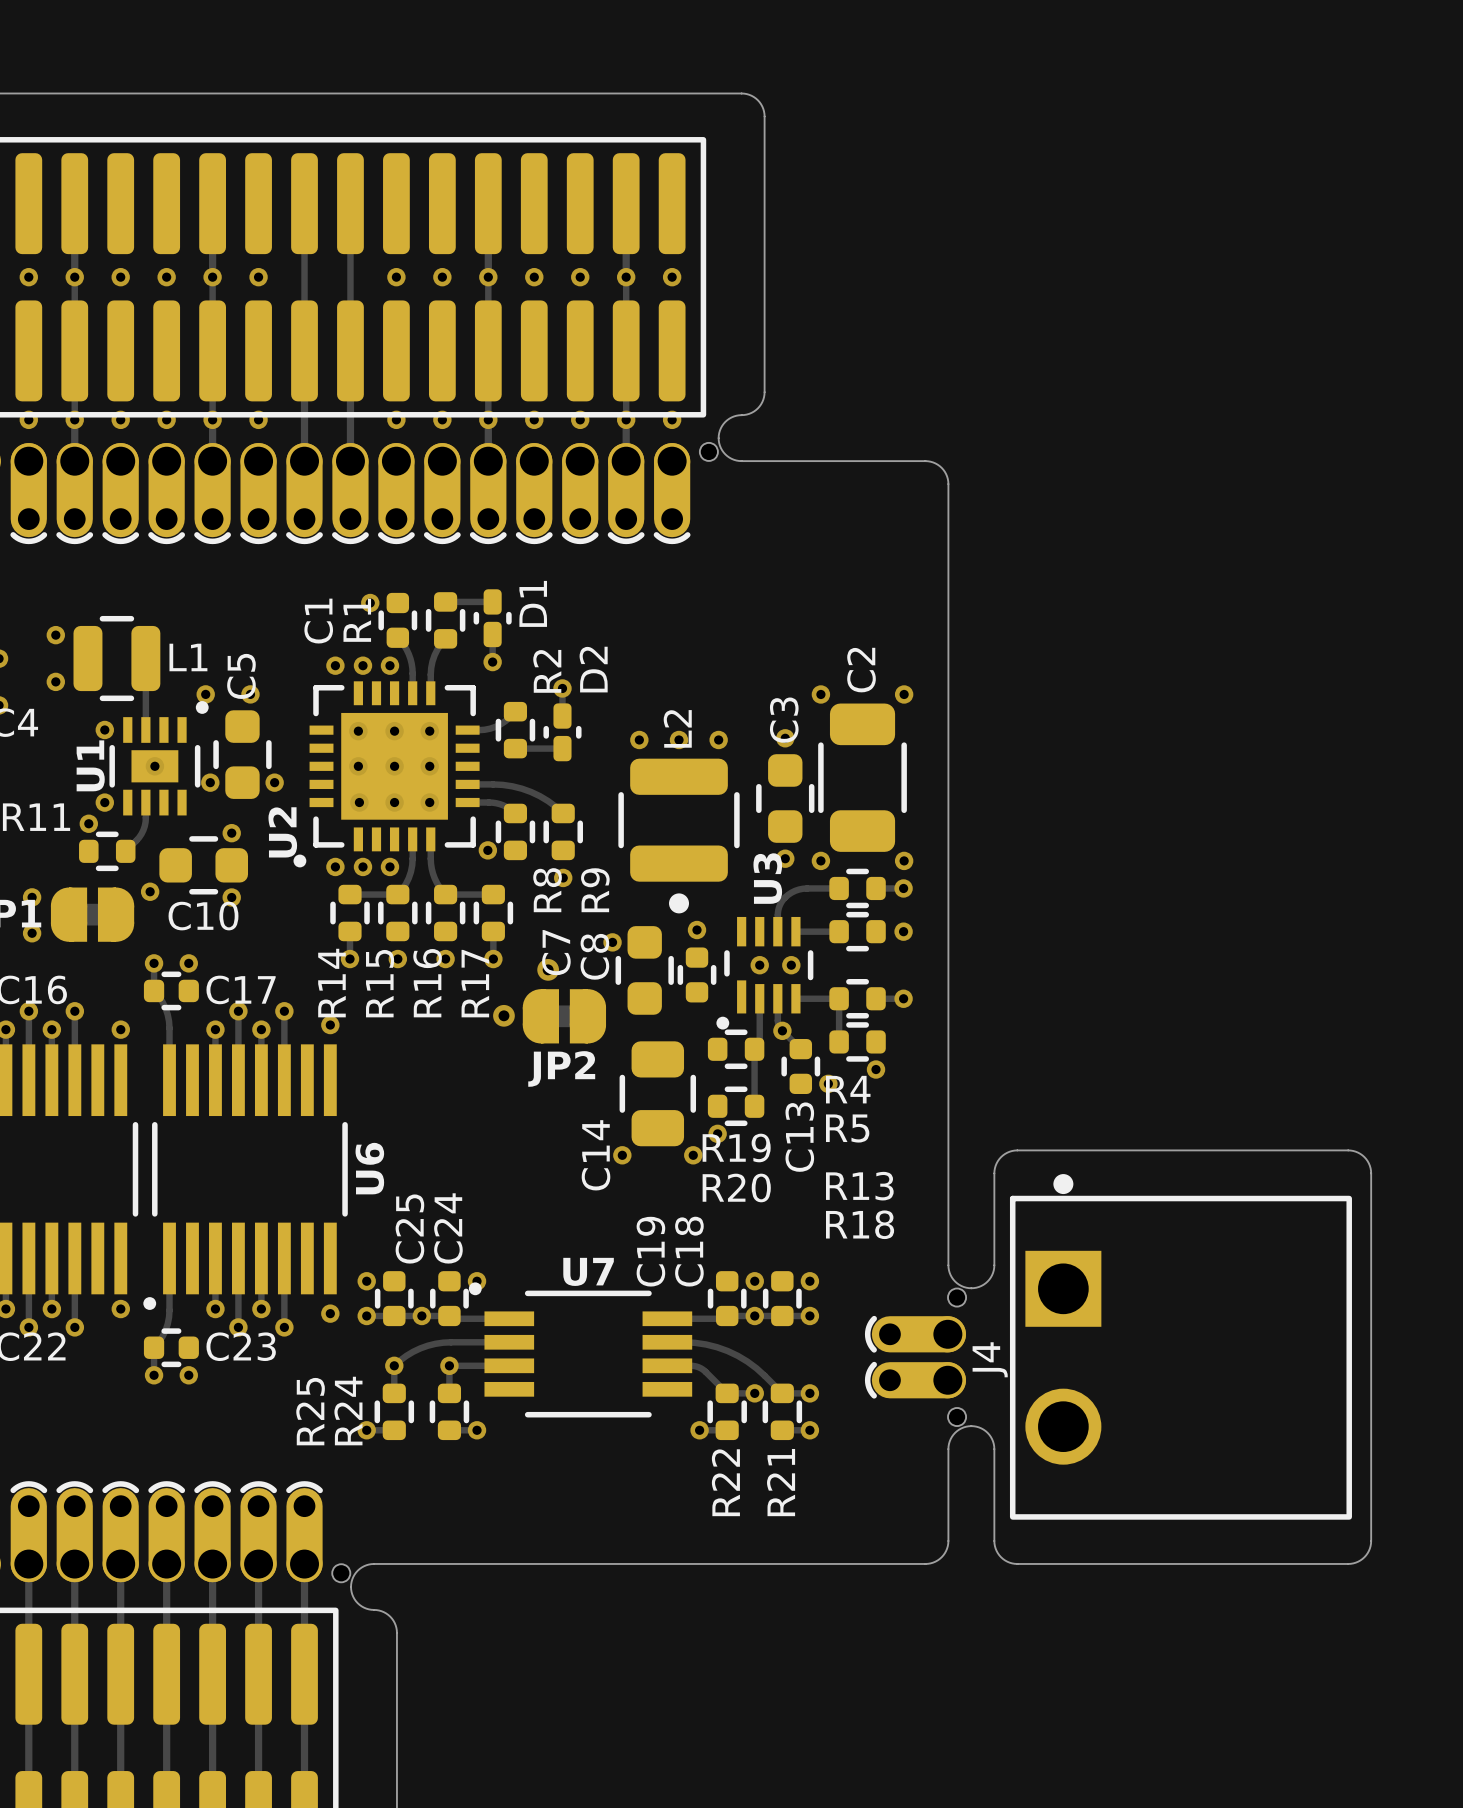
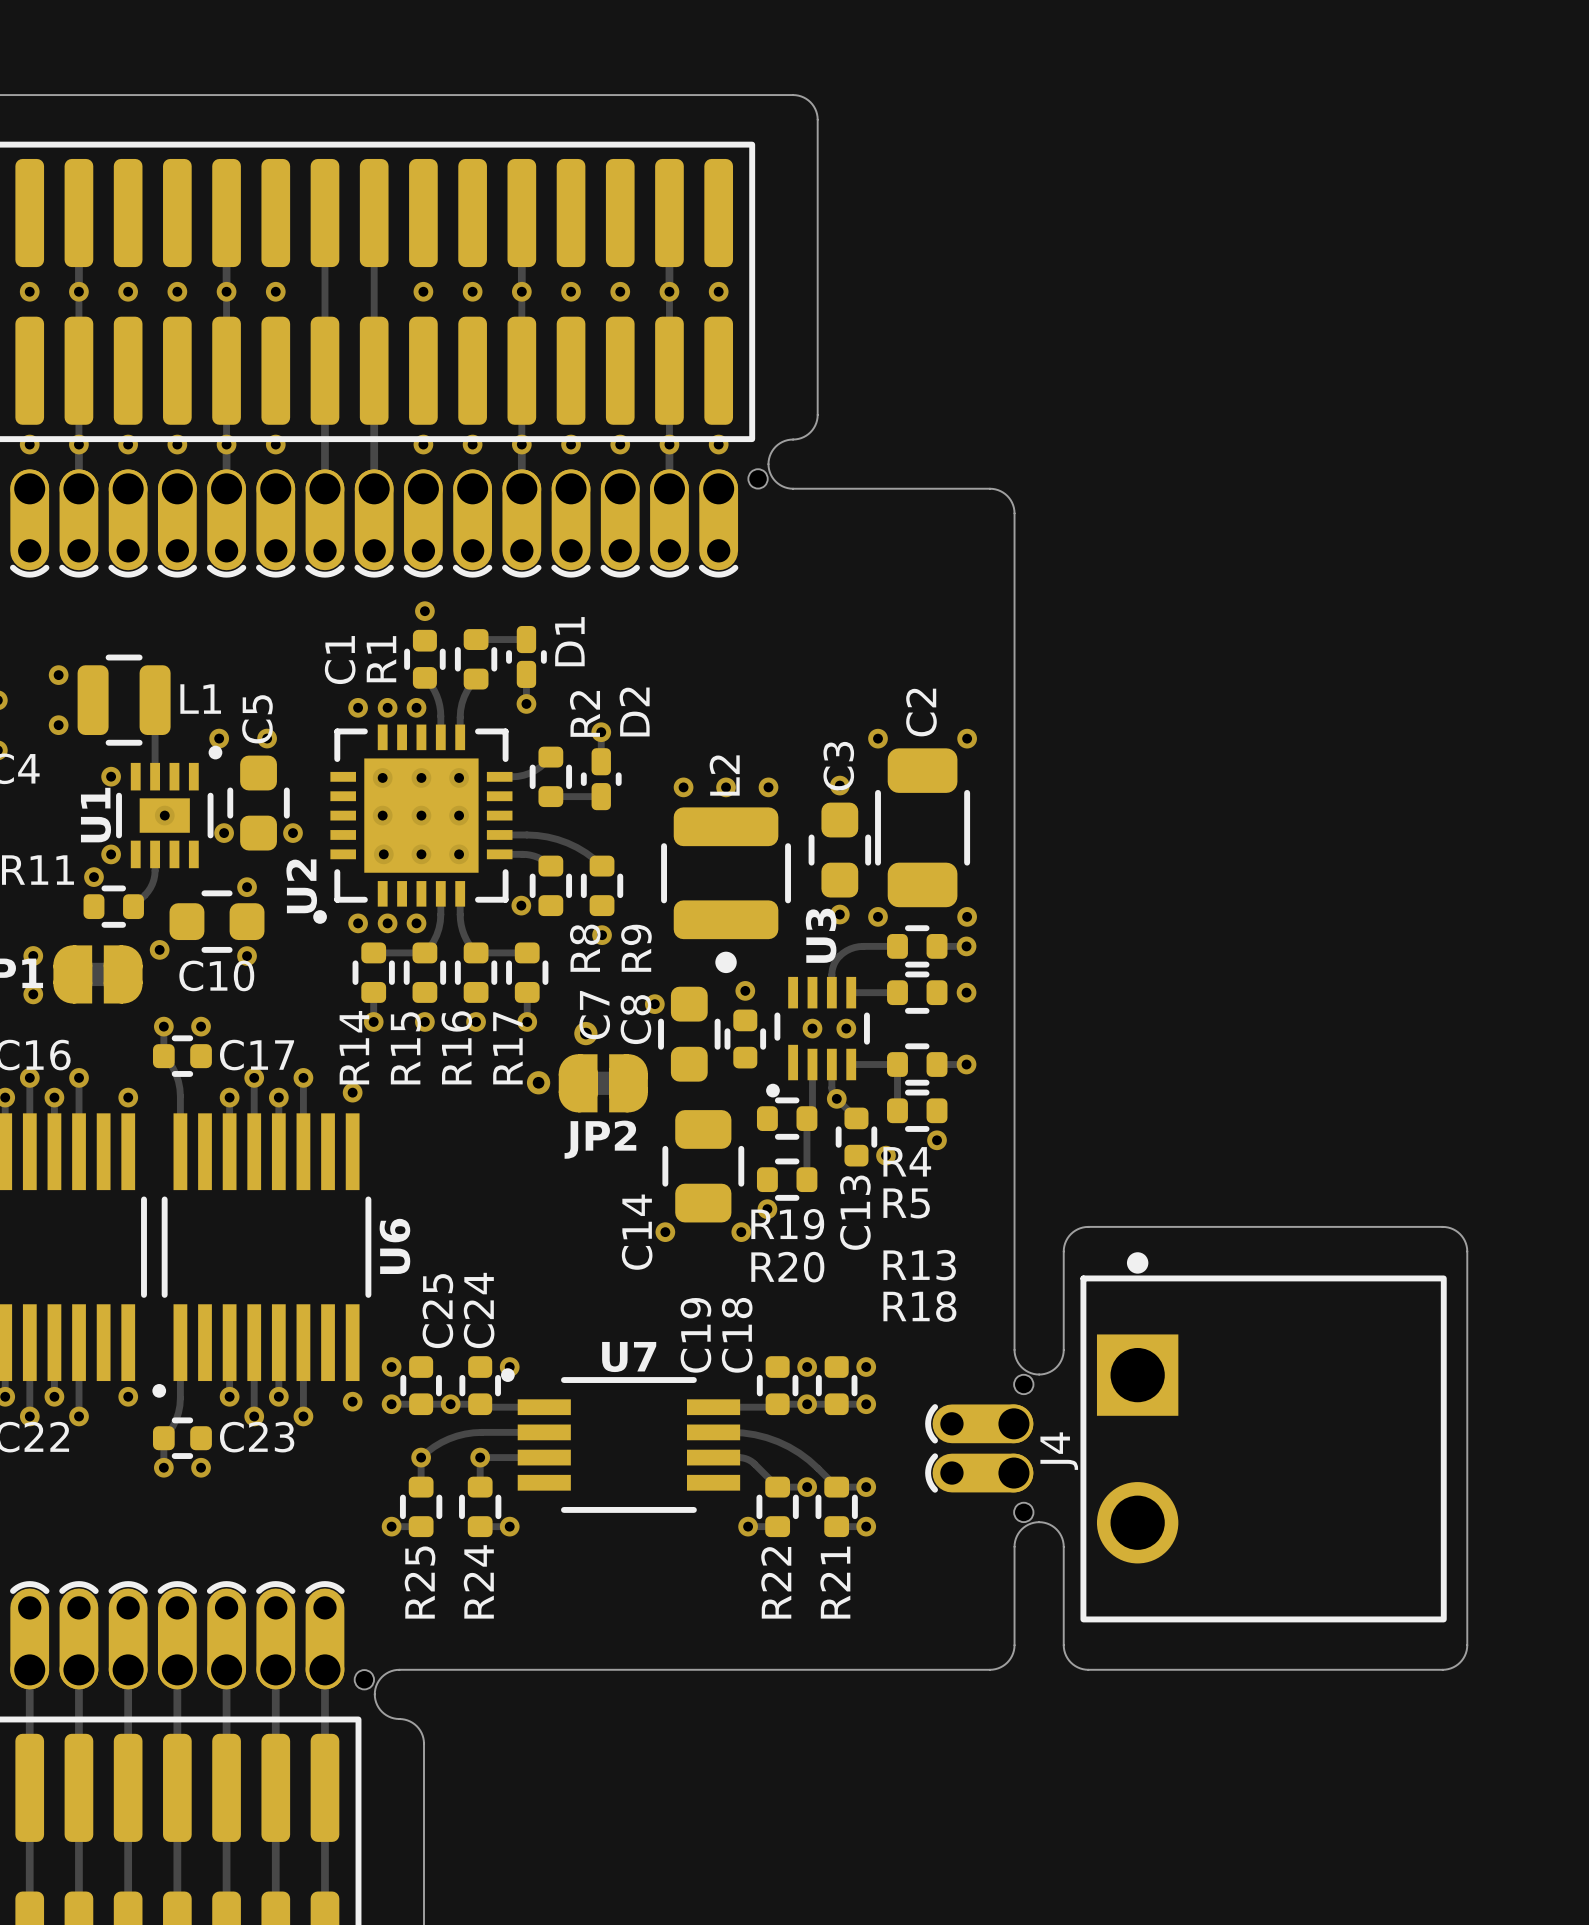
via position: (370, 603) -> (424, 611)
R25 name position: R25 (310, 1411) -> R25 (420, 1582)
R24 name position: R24 (348, 1411) -> R24 (478, 1581)

